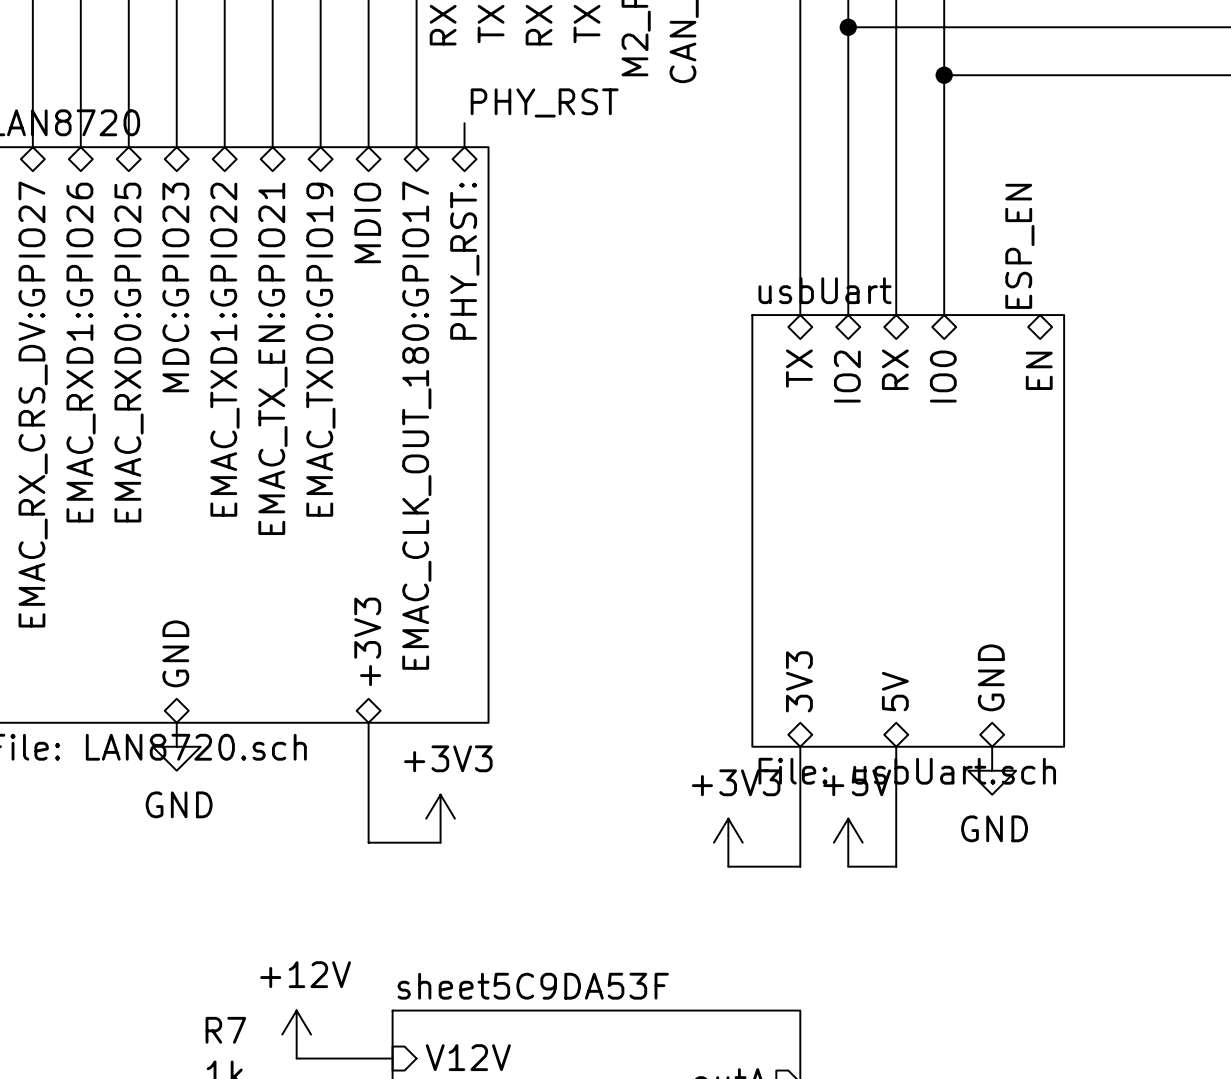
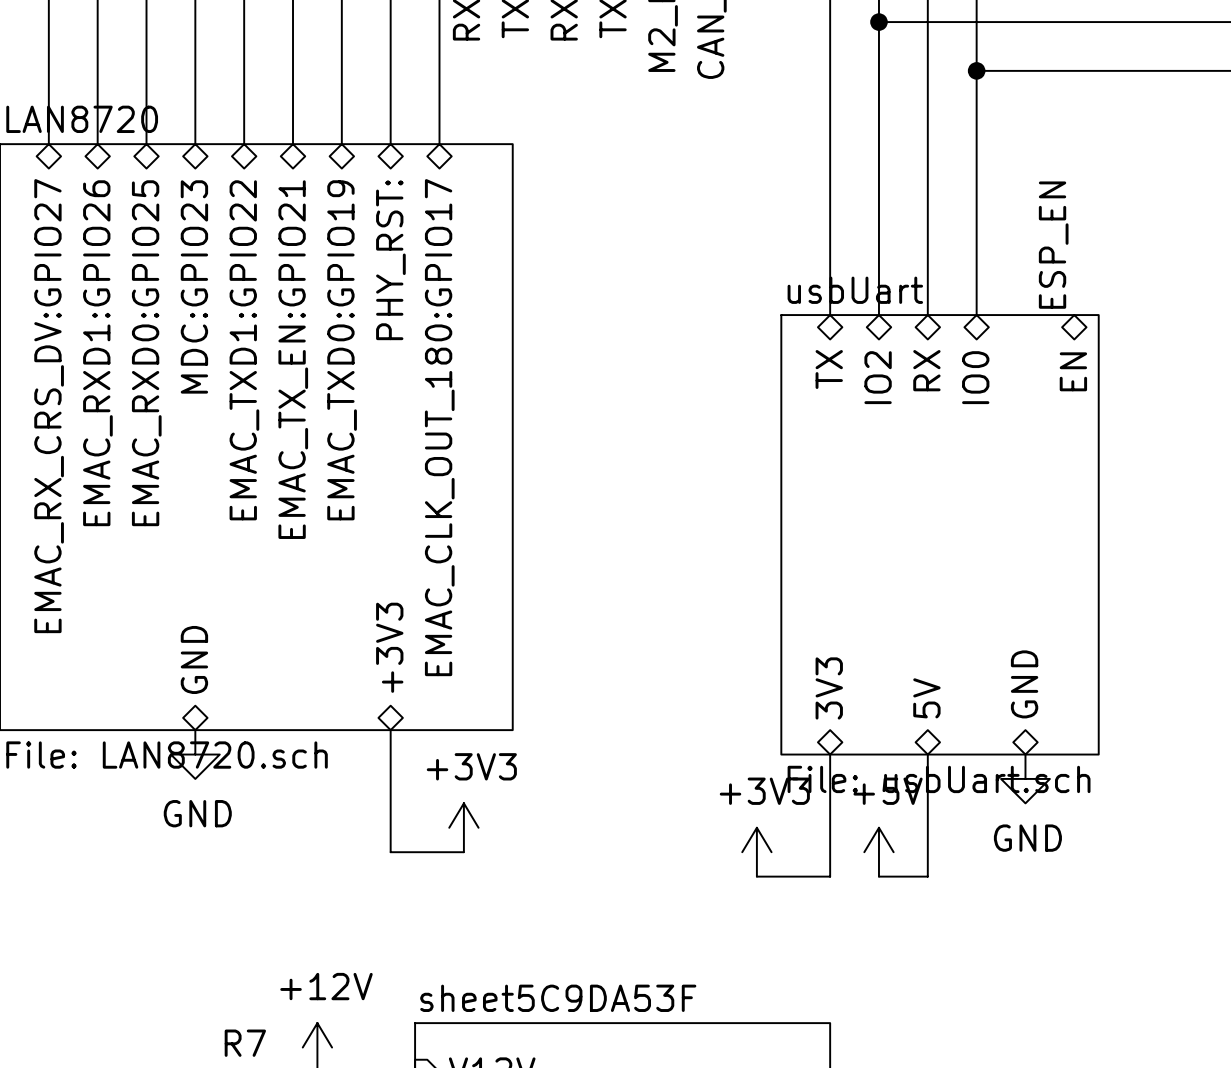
label: PHY_RST (544, 102) -> none
wire: (464, 123) (464, 147) -> none
sheet pin: MDIO (367, 222) -> PHY_RST: (390, 260)
sheet pin: PHY_RST: (464, 261) -> none

